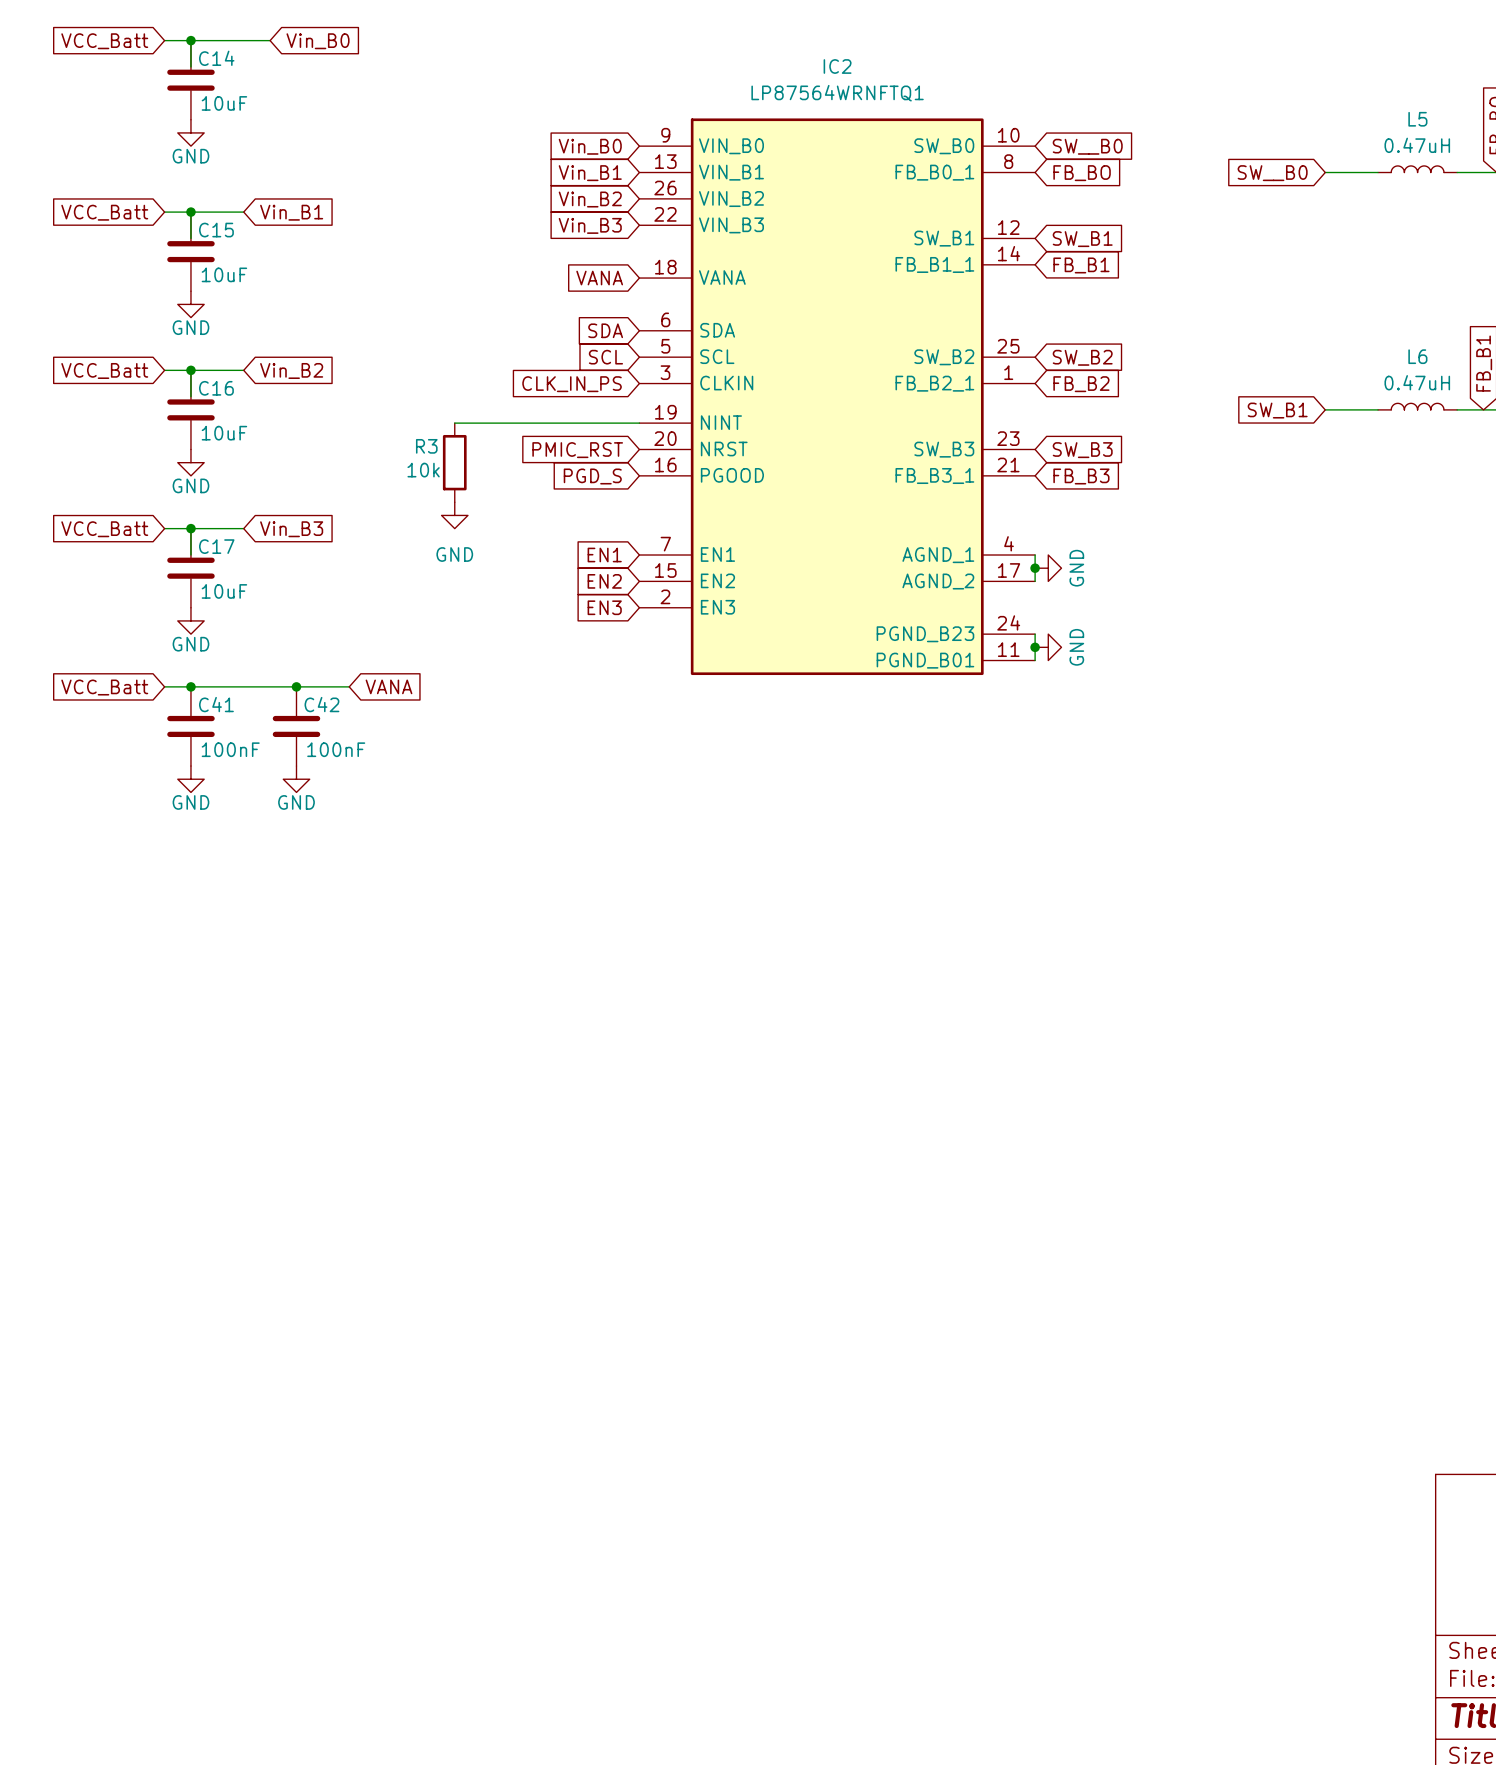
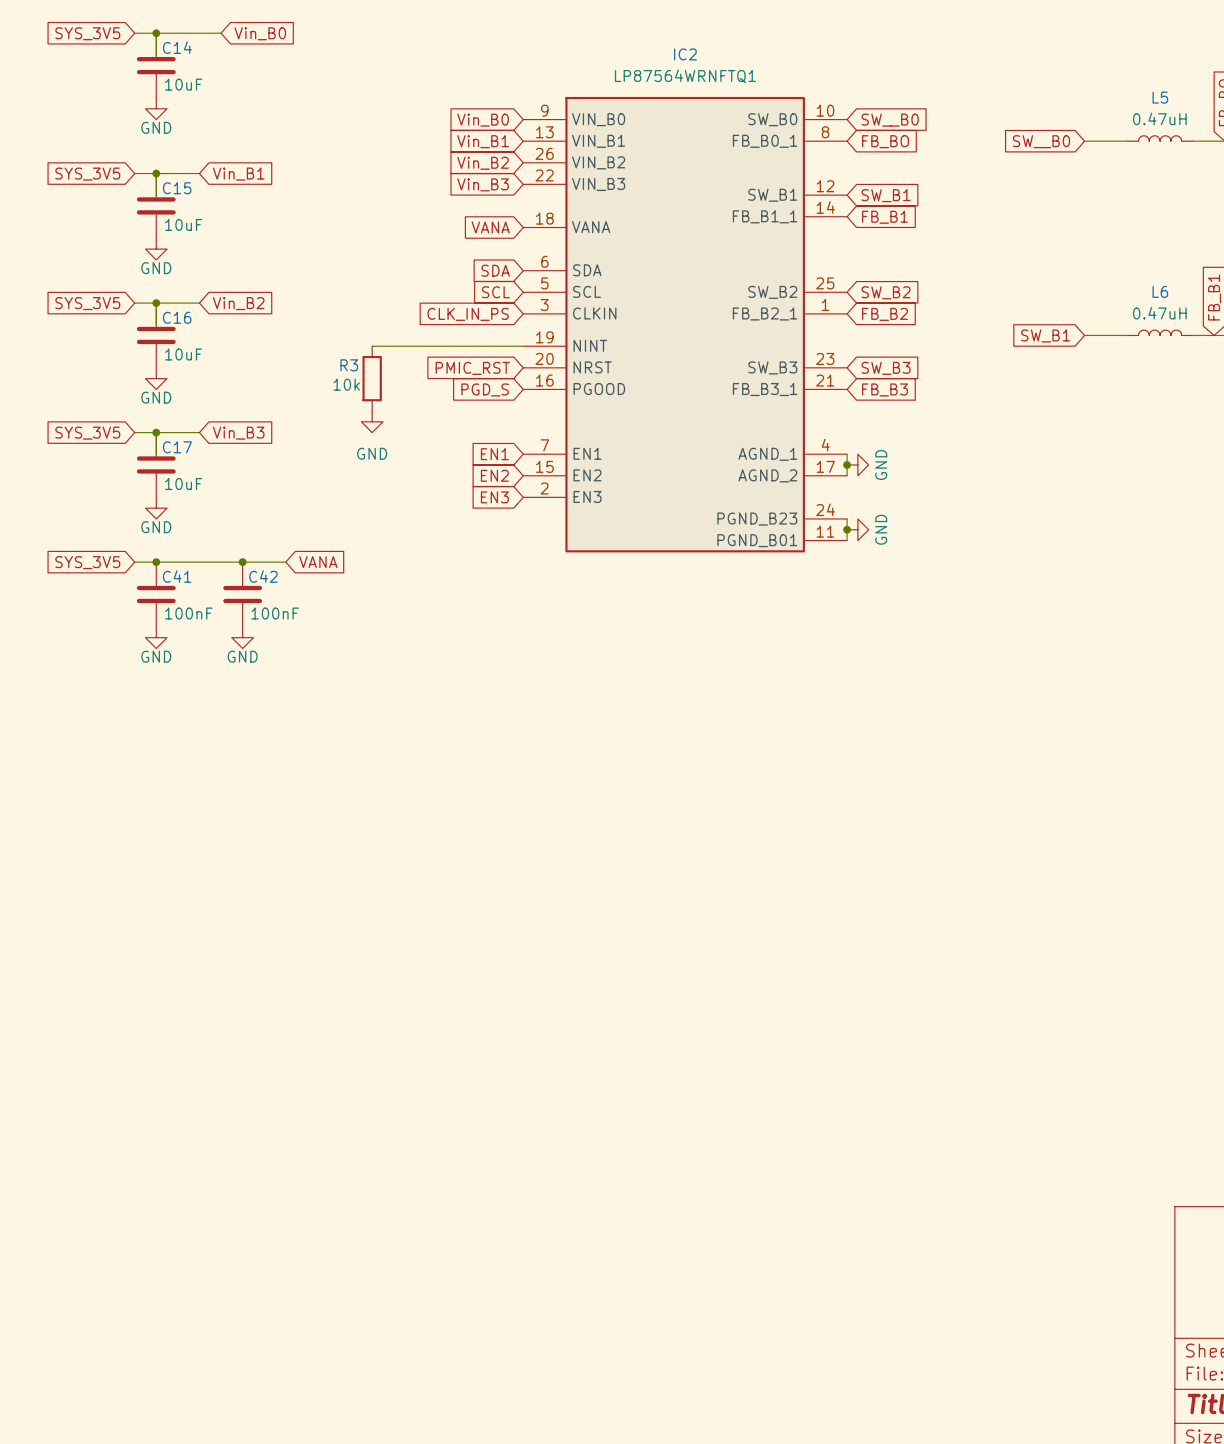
global label: VCC_Batt (104, 41) -> SYS_3V5 (87, 33)
global label: VCC_Batt (104, 212) -> SYS_3V5 (87, 174)
global label: VCC_Batt (104, 370) -> SYS_3V5 (87, 303)
global label: VCC_Batt (104, 529) -> SYS_3V5 (87, 433)
global label: VCC_Batt (104, 687) -> SYS_3V5 (87, 562)

